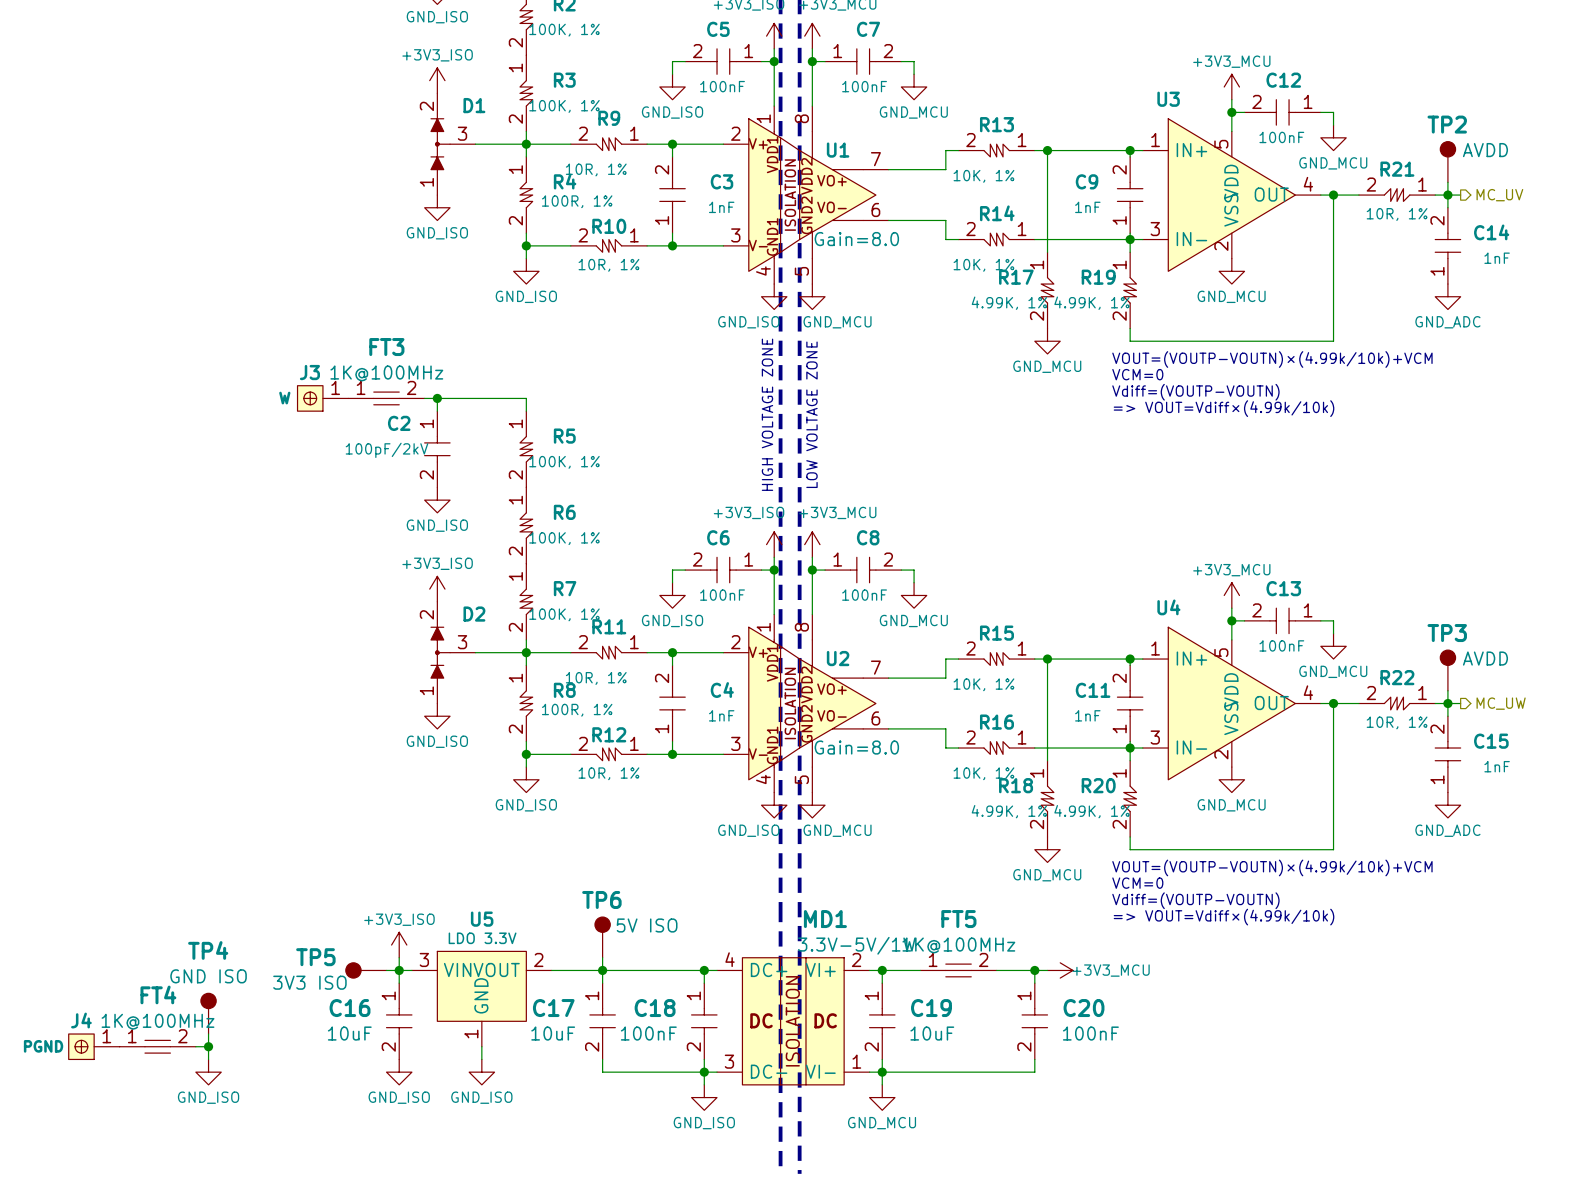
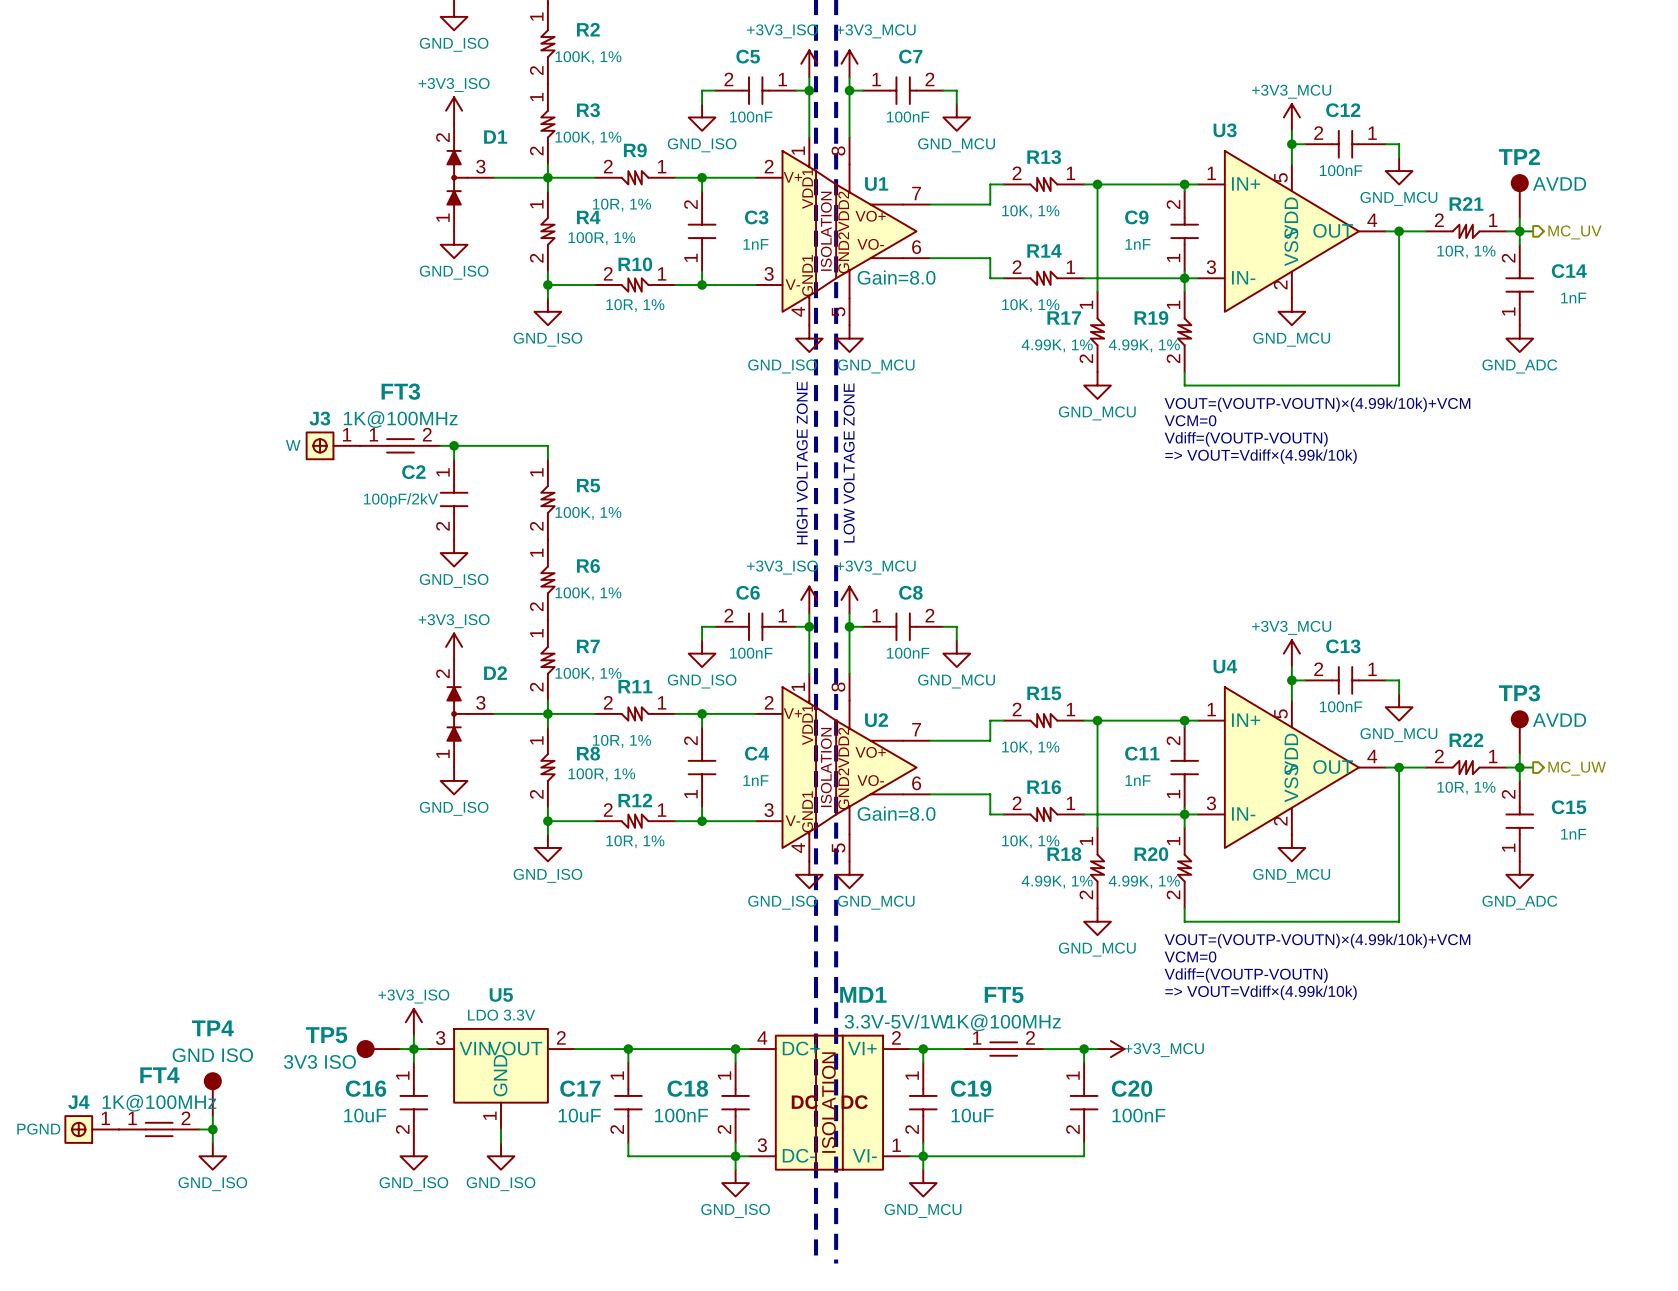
TP6: 5V ISO (602, 937) -> none
wire: (602, 957) (602, 970) -> none

